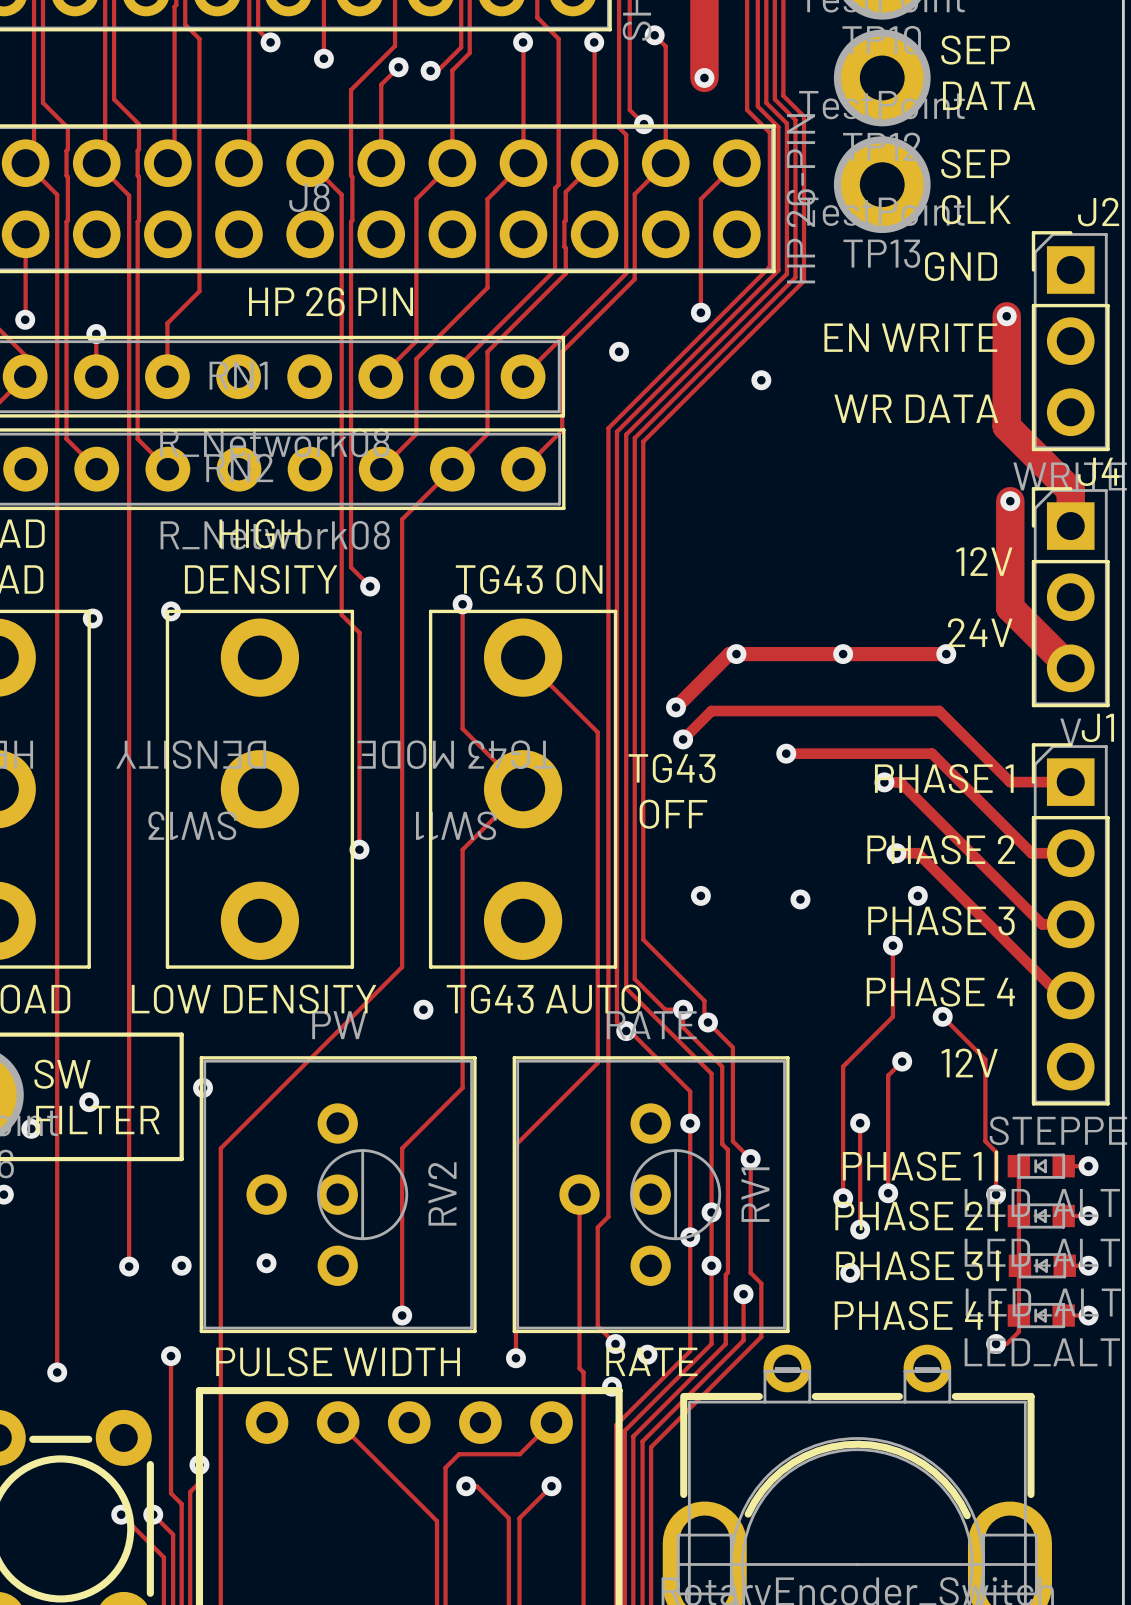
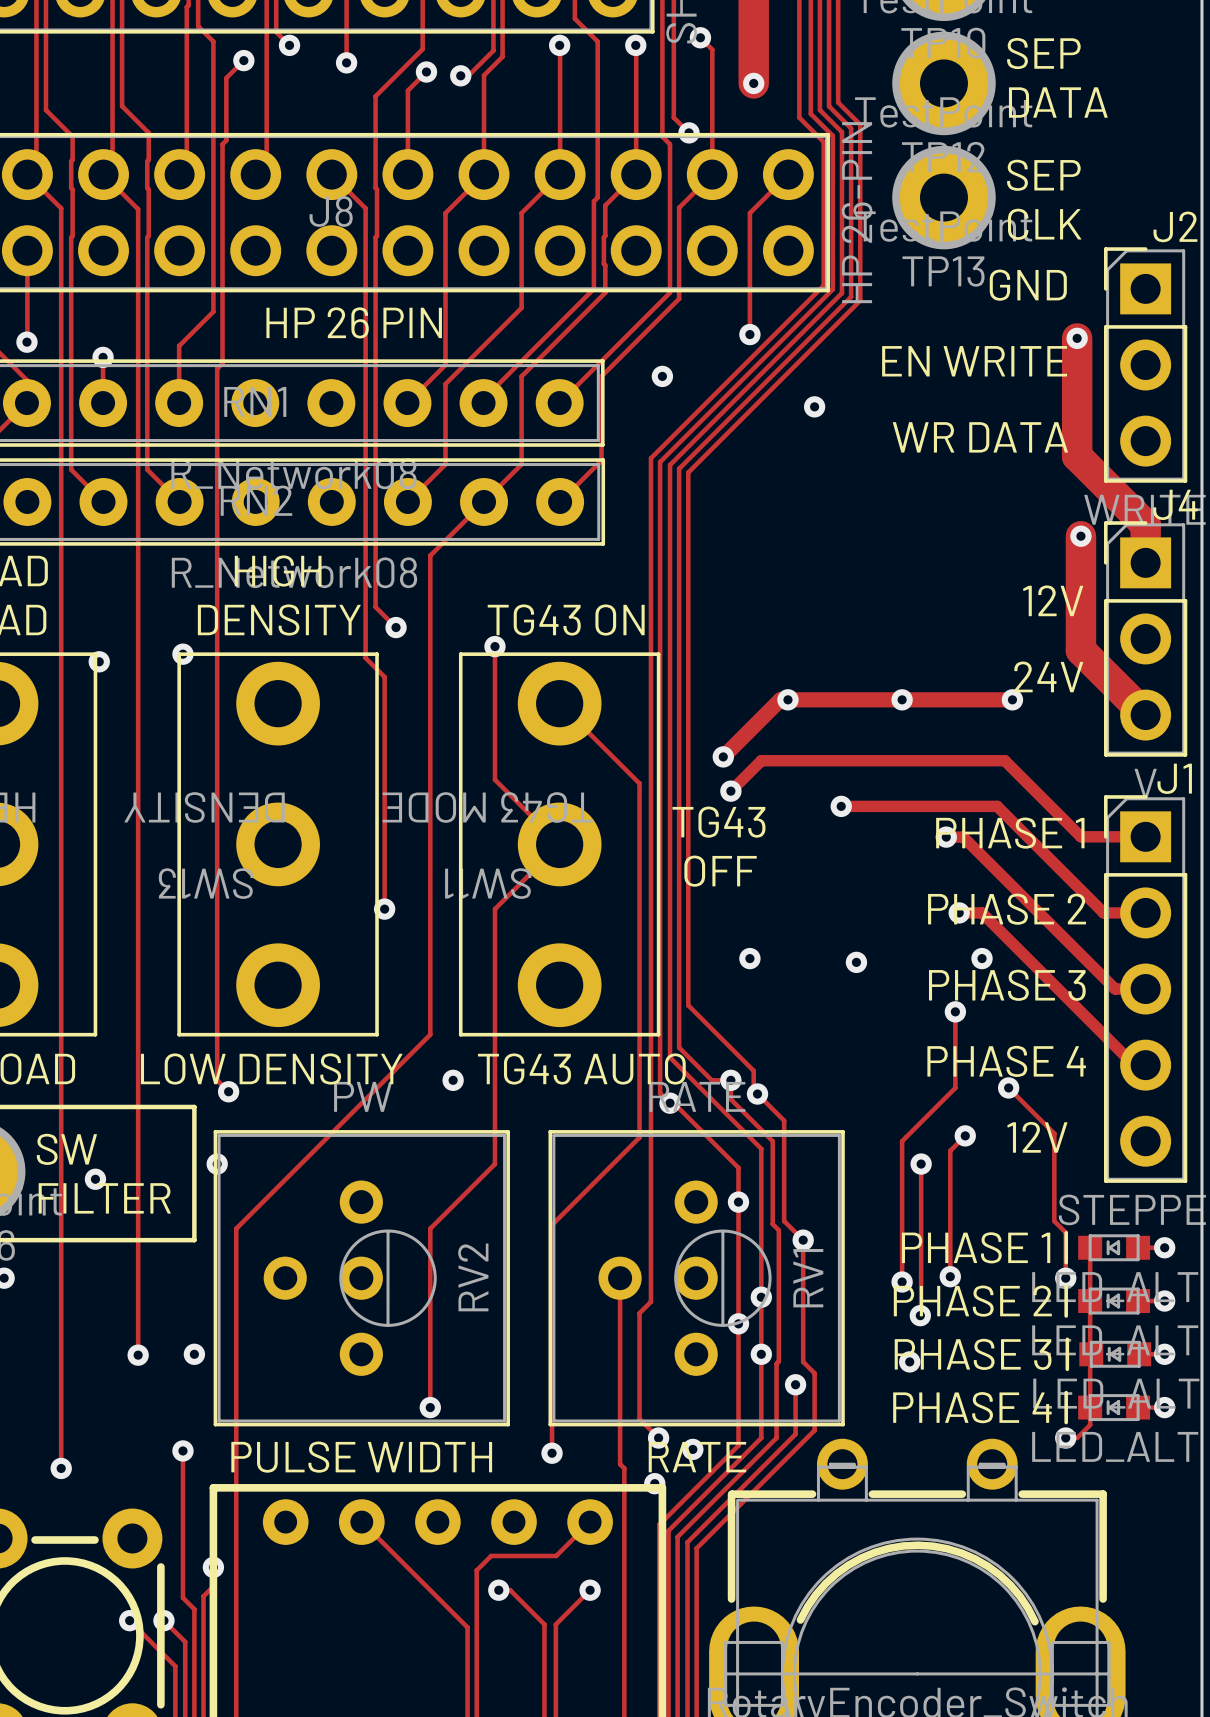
track: none -> (243, 60) (226, 78) (226, 140) (222, 144) (222, 363) (217, 368) (217, 1080) (228, 1091)
via: none -> (243, 60)
via: none -> (228, 1091)
track: (860, 1123) (860, 1229) -> (921, 1164) (921, 1316)
via position: (860, 1123) -> (921, 1164)
via: (31, 1128) -> none
via: (266, 1263) -> none

